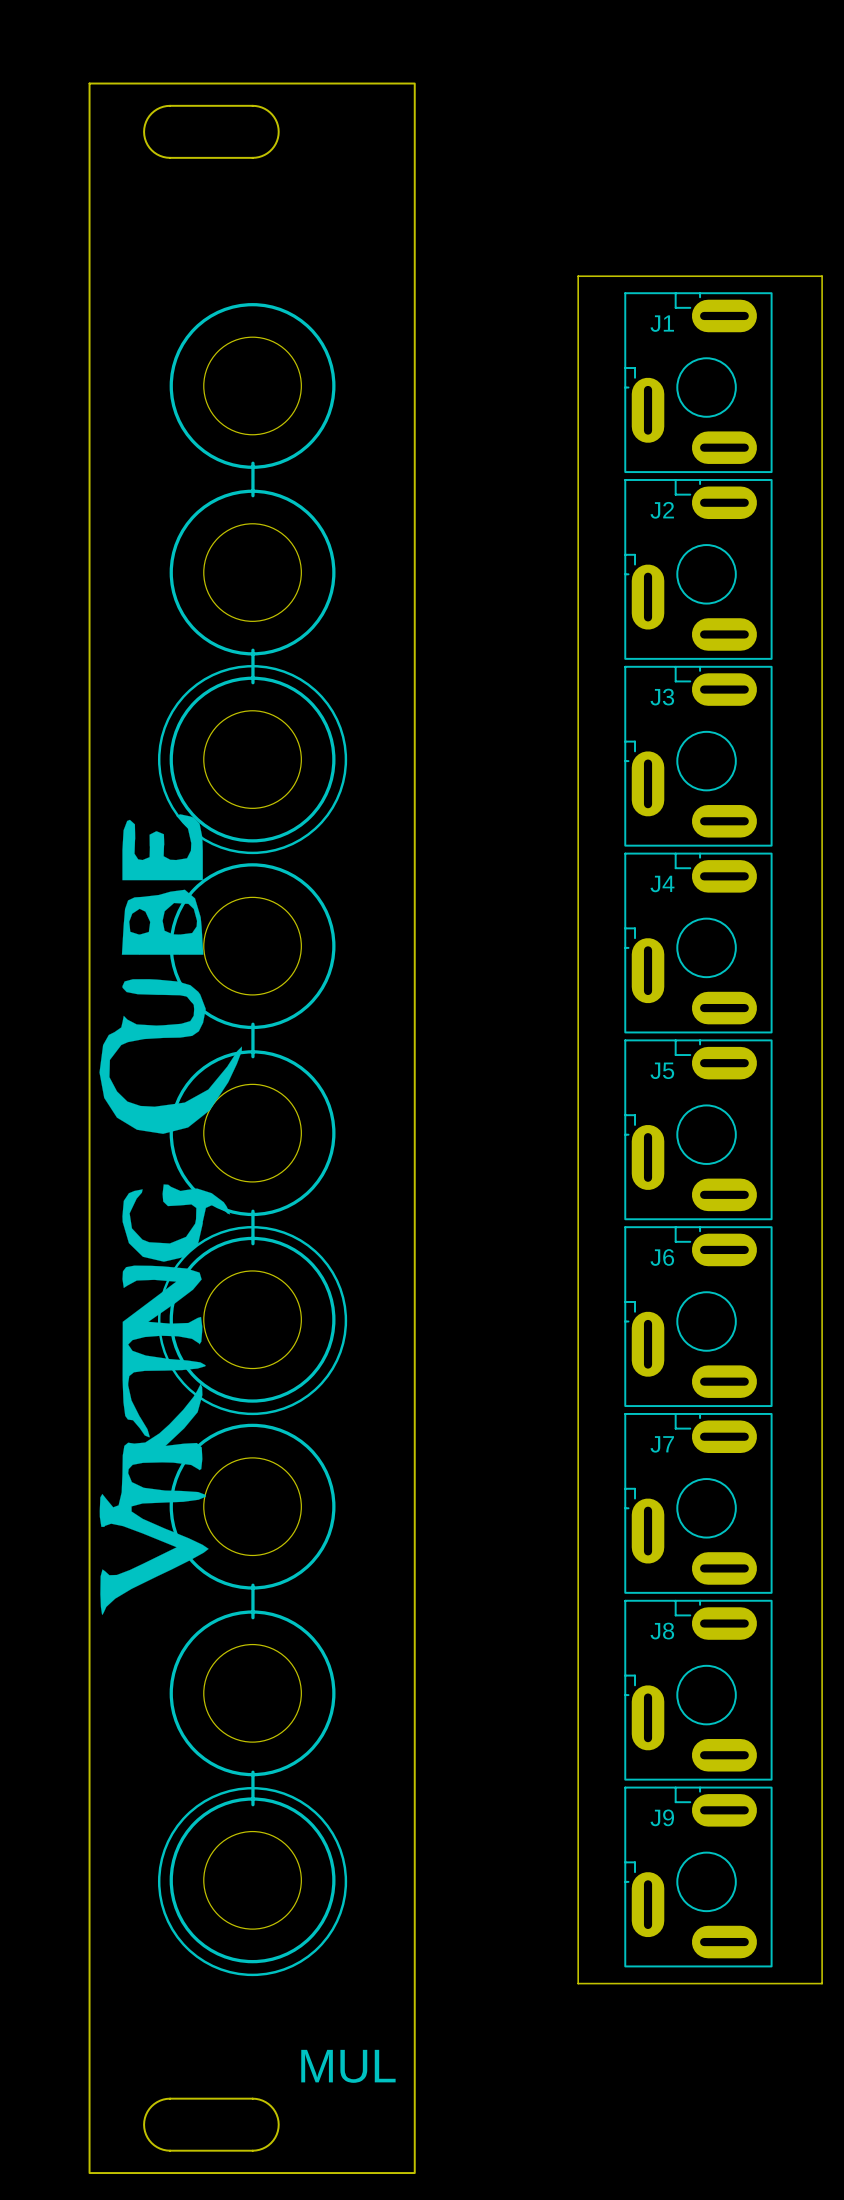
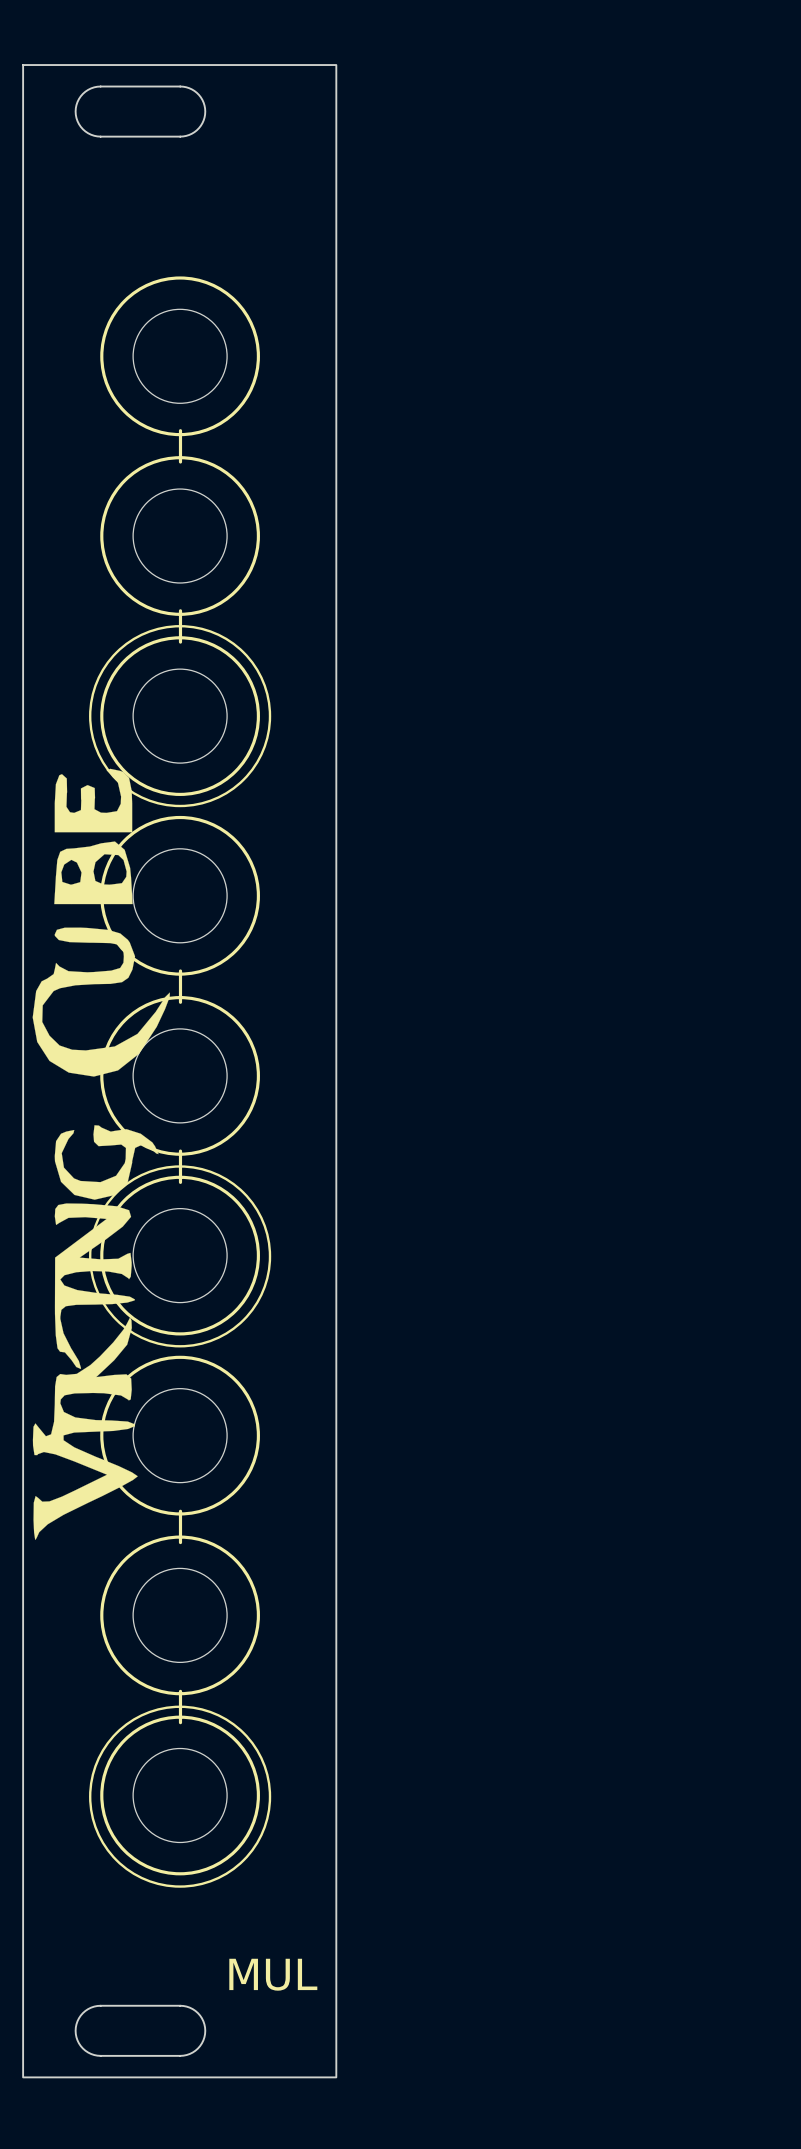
board edge: (578, 276) (578, 1983) (822, 1983) (822, 276) (578, 276) -> none
J1: (698, 382) -> none
J2: (698, 569) -> none
J3: (698, 756) -> none
J4: (698, 943) -> none
J5: (698, 1129) -> none
J6: (698, 1316) -> none
J7: (698, 1503) -> none
J8: (698, 1690) -> none
J9: (698, 1877) -> none

